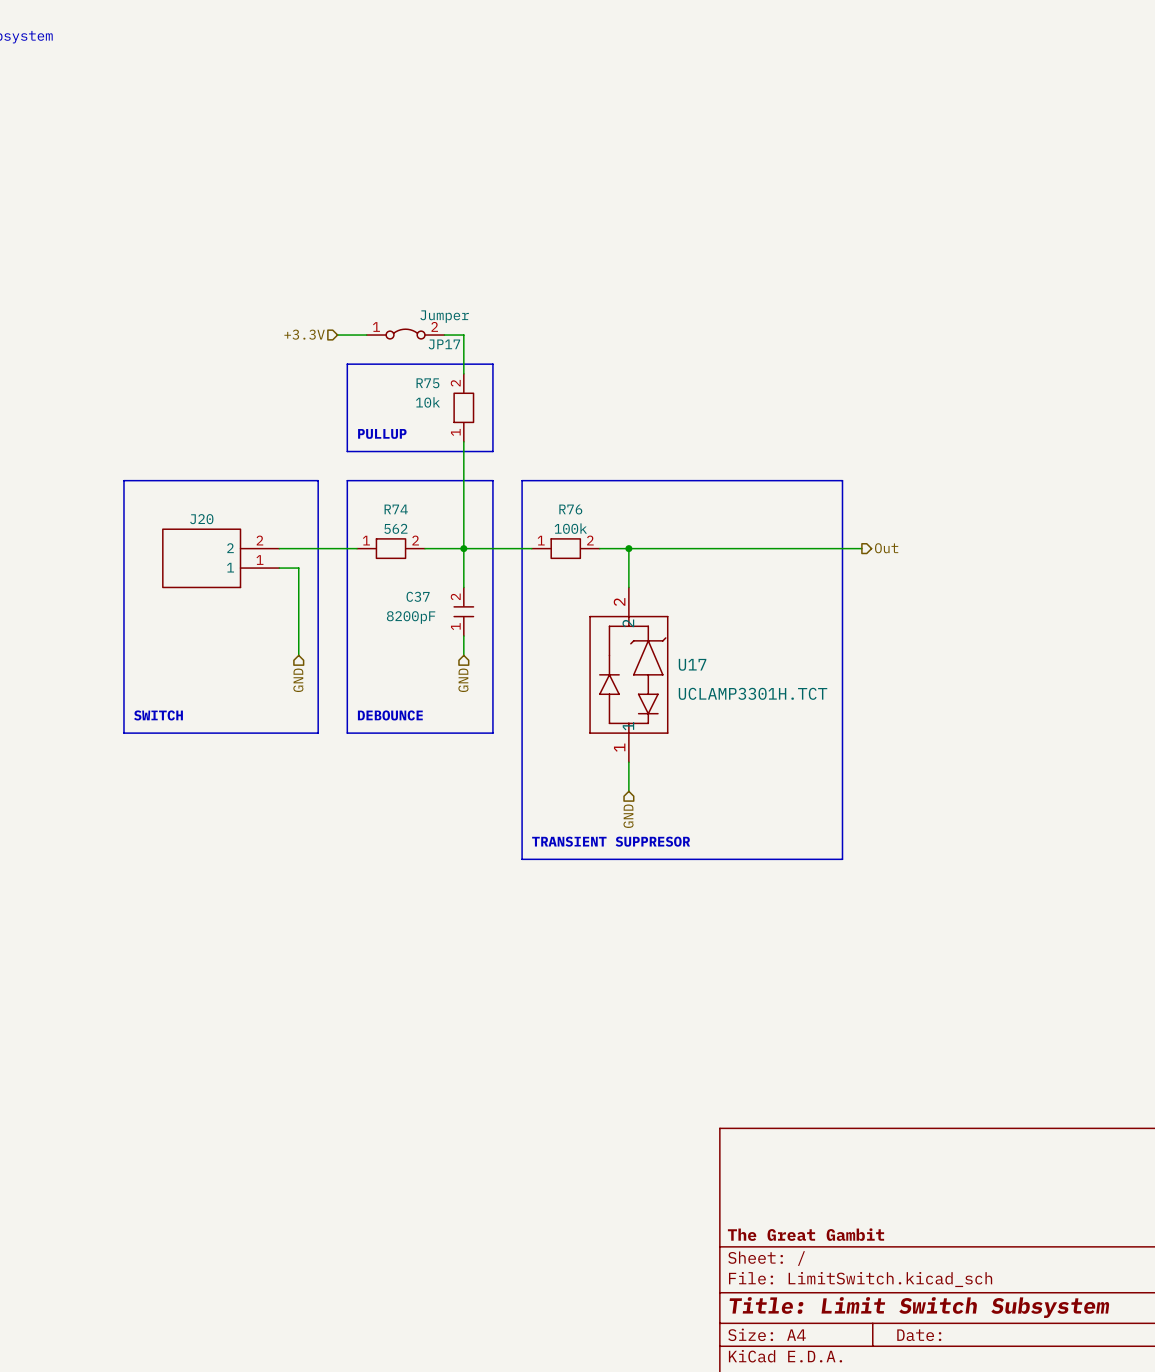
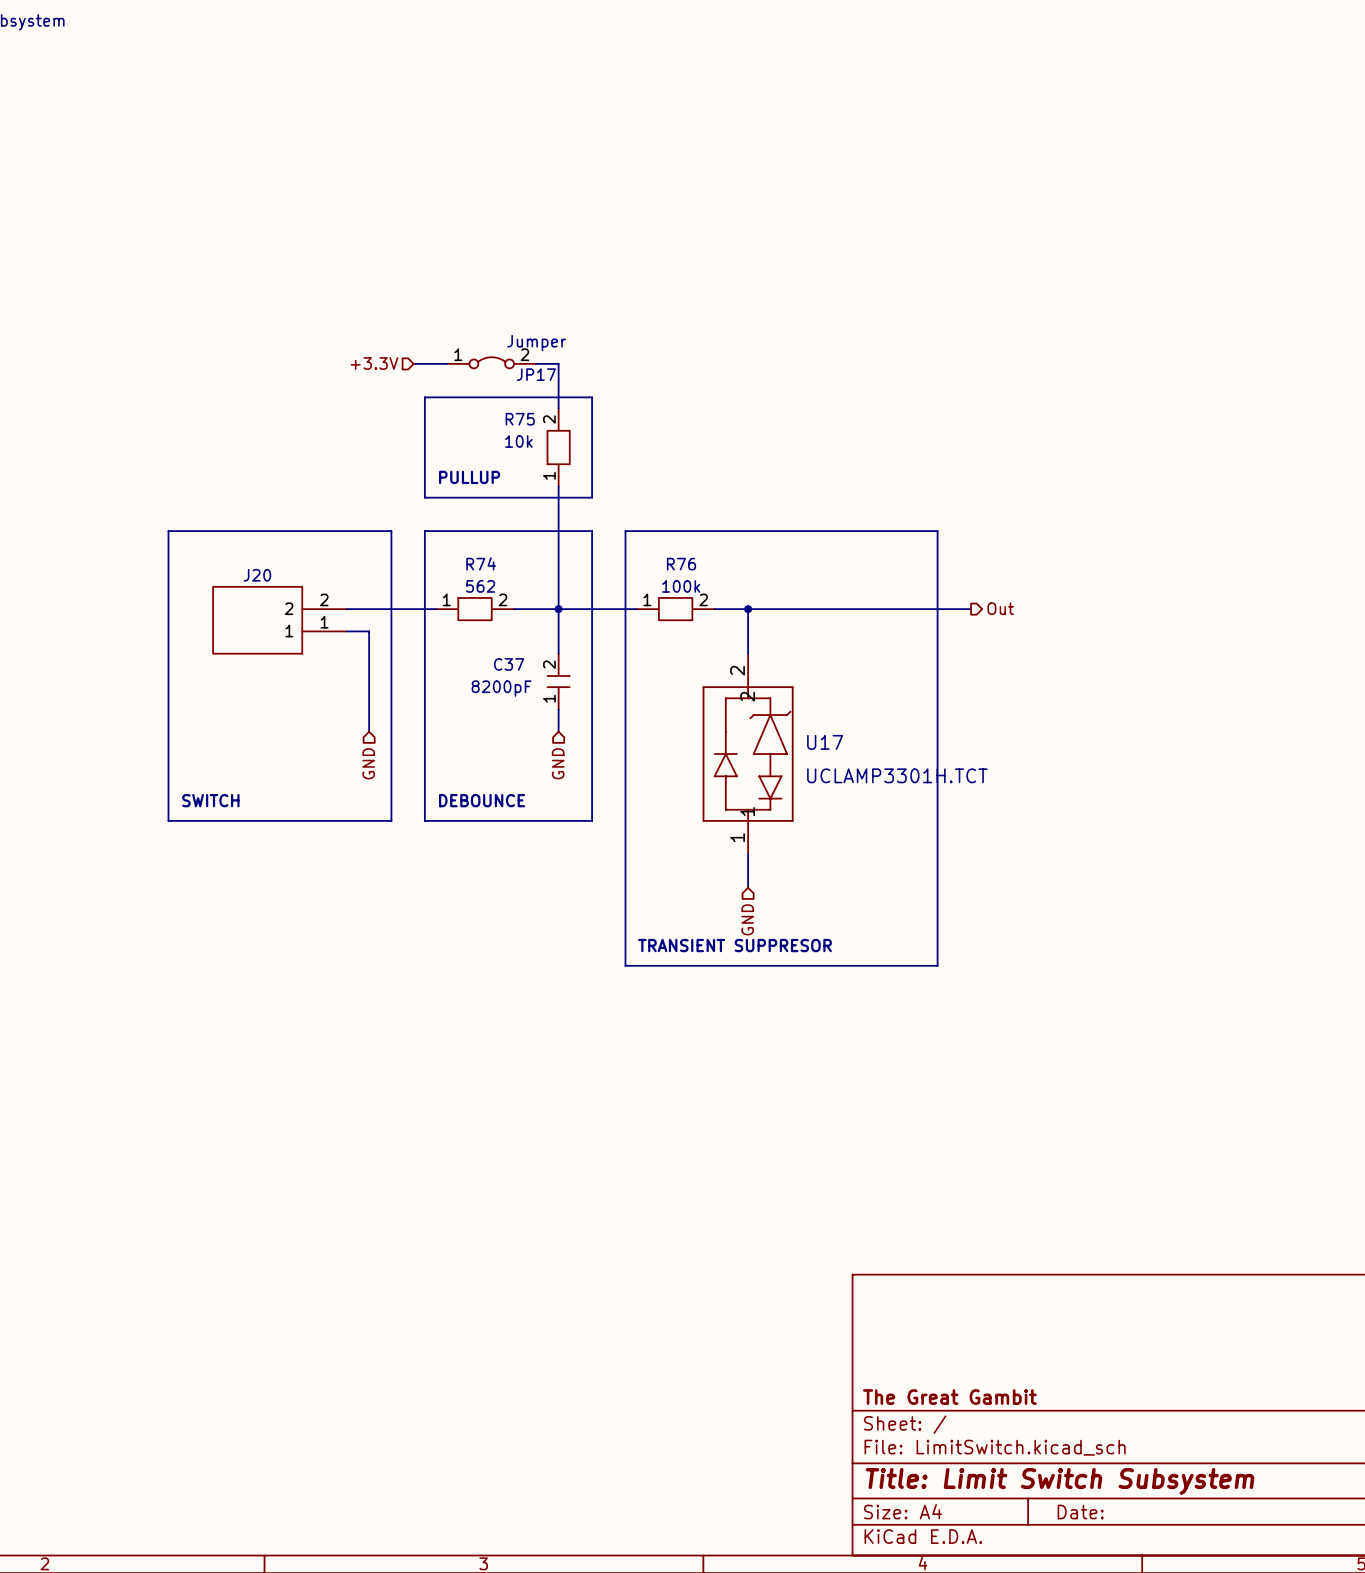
line: (793, 480) (842, 480) (842, 859) (793, 859) -> (937, 531) (937, 965)
wire: (823, 548) (861, 548) -> none
hierarchical label position: Out (886, 548) -> Out (1000, 608)

